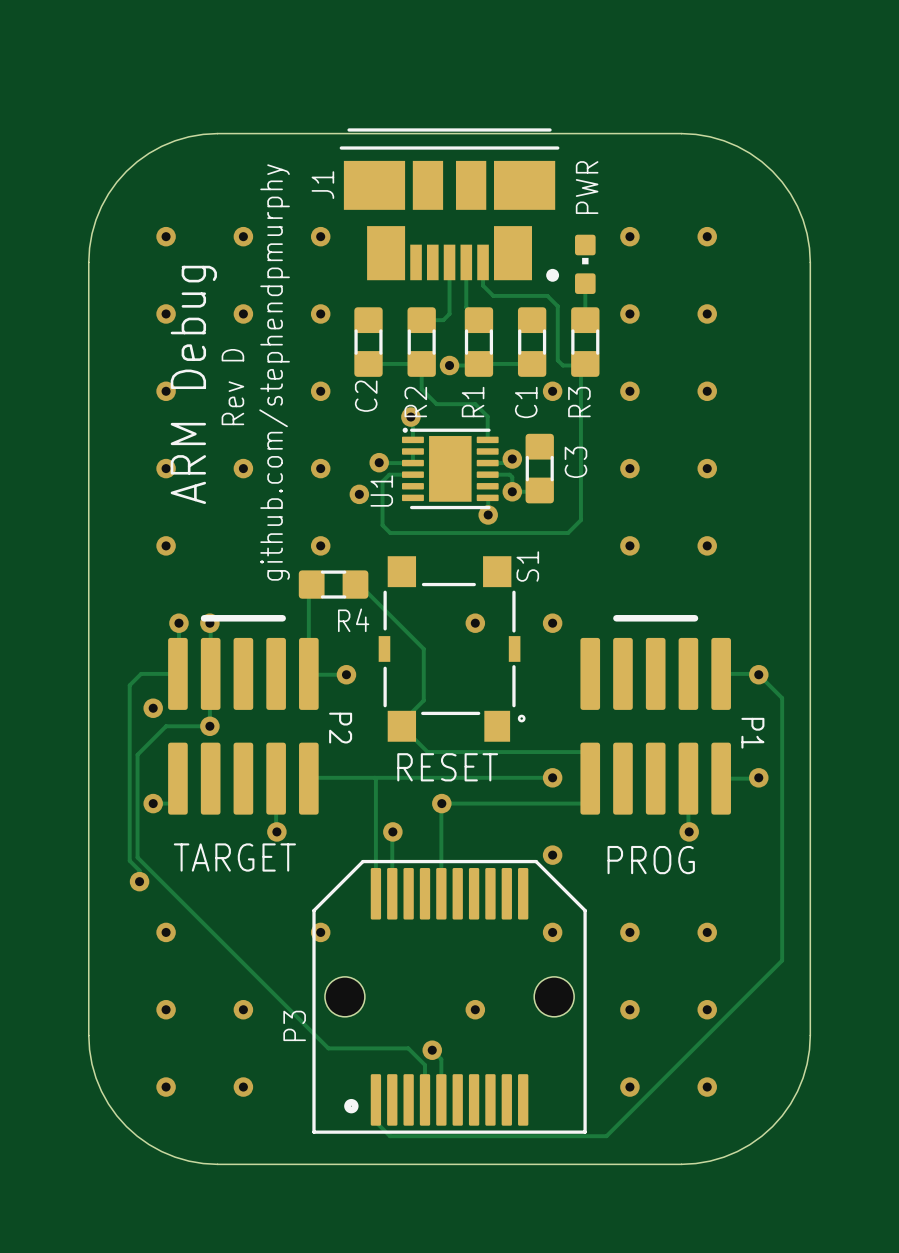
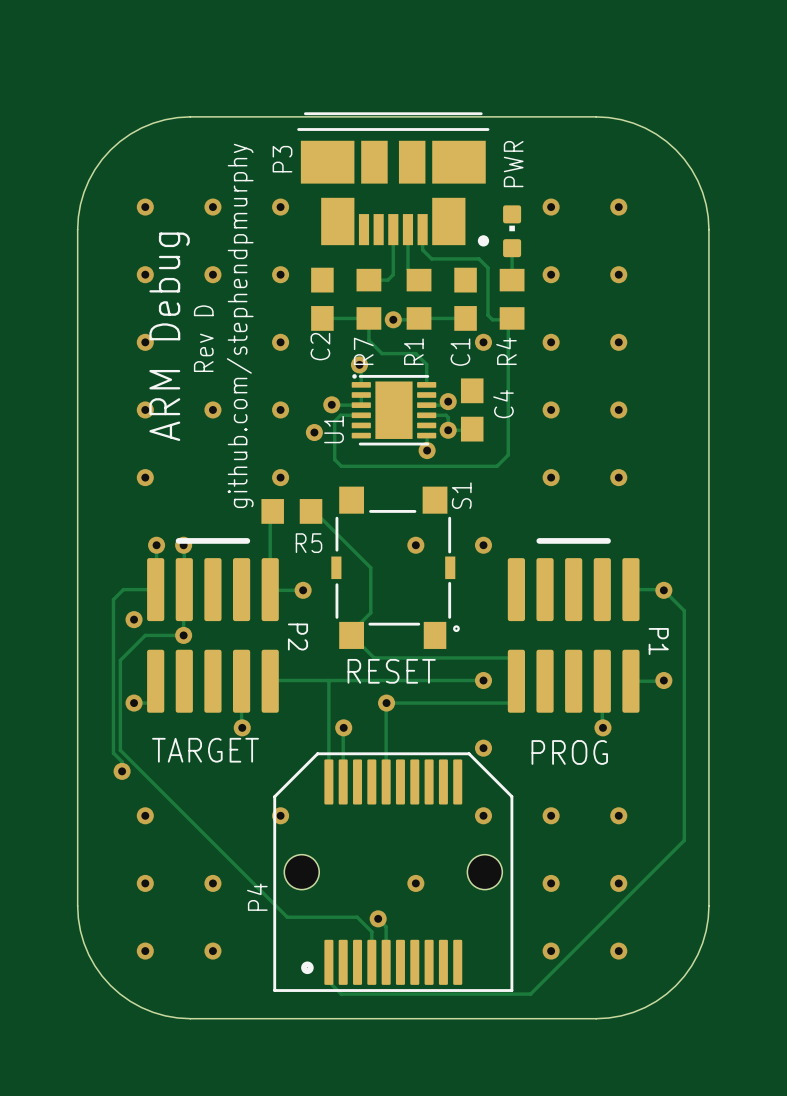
J1 name: J1 (322, 185) -> P3 (282, 159)
C2 footprint: [354, 307, 383, 377] -> [311, 267, 334, 331]
R1 footprint: [464, 307, 494, 377] -> [406, 268, 432, 330]
C1 footprint: [517, 307, 547, 377] -> [454, 267, 477, 331]
R2: (421, 342) -> none
R7: none -> (368, 299)
R3: (585, 342) -> none
C3: (539, 468) -> none
C4: none -> (472, 409)
R4 footprint: [298, 570, 369, 599] -> [499, 268, 525, 330]
R5: none -> (291, 511)
P3 name: P3 (294, 1025) -> P4 (257, 897)

